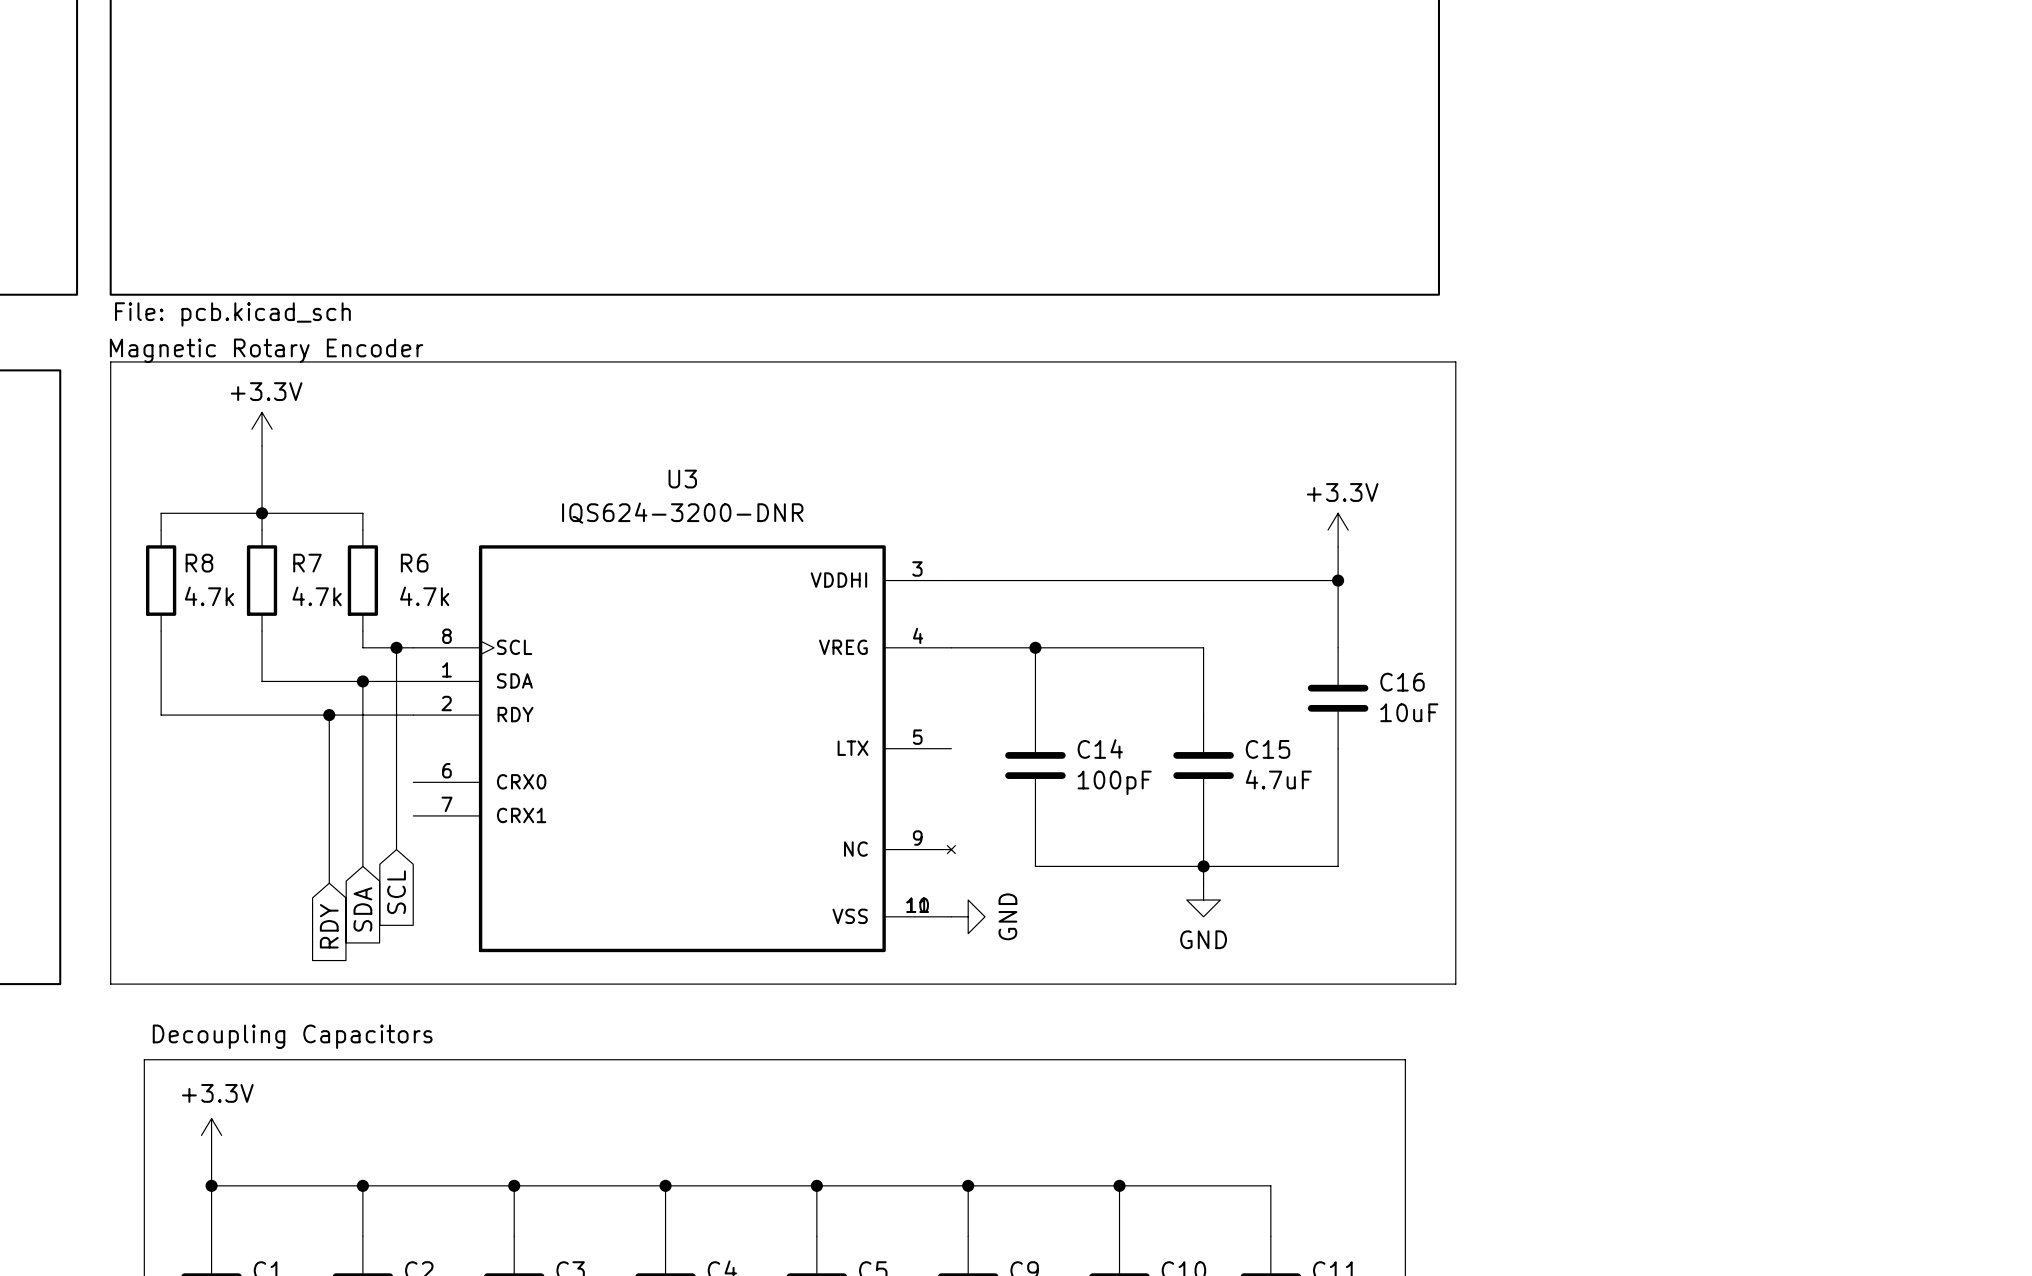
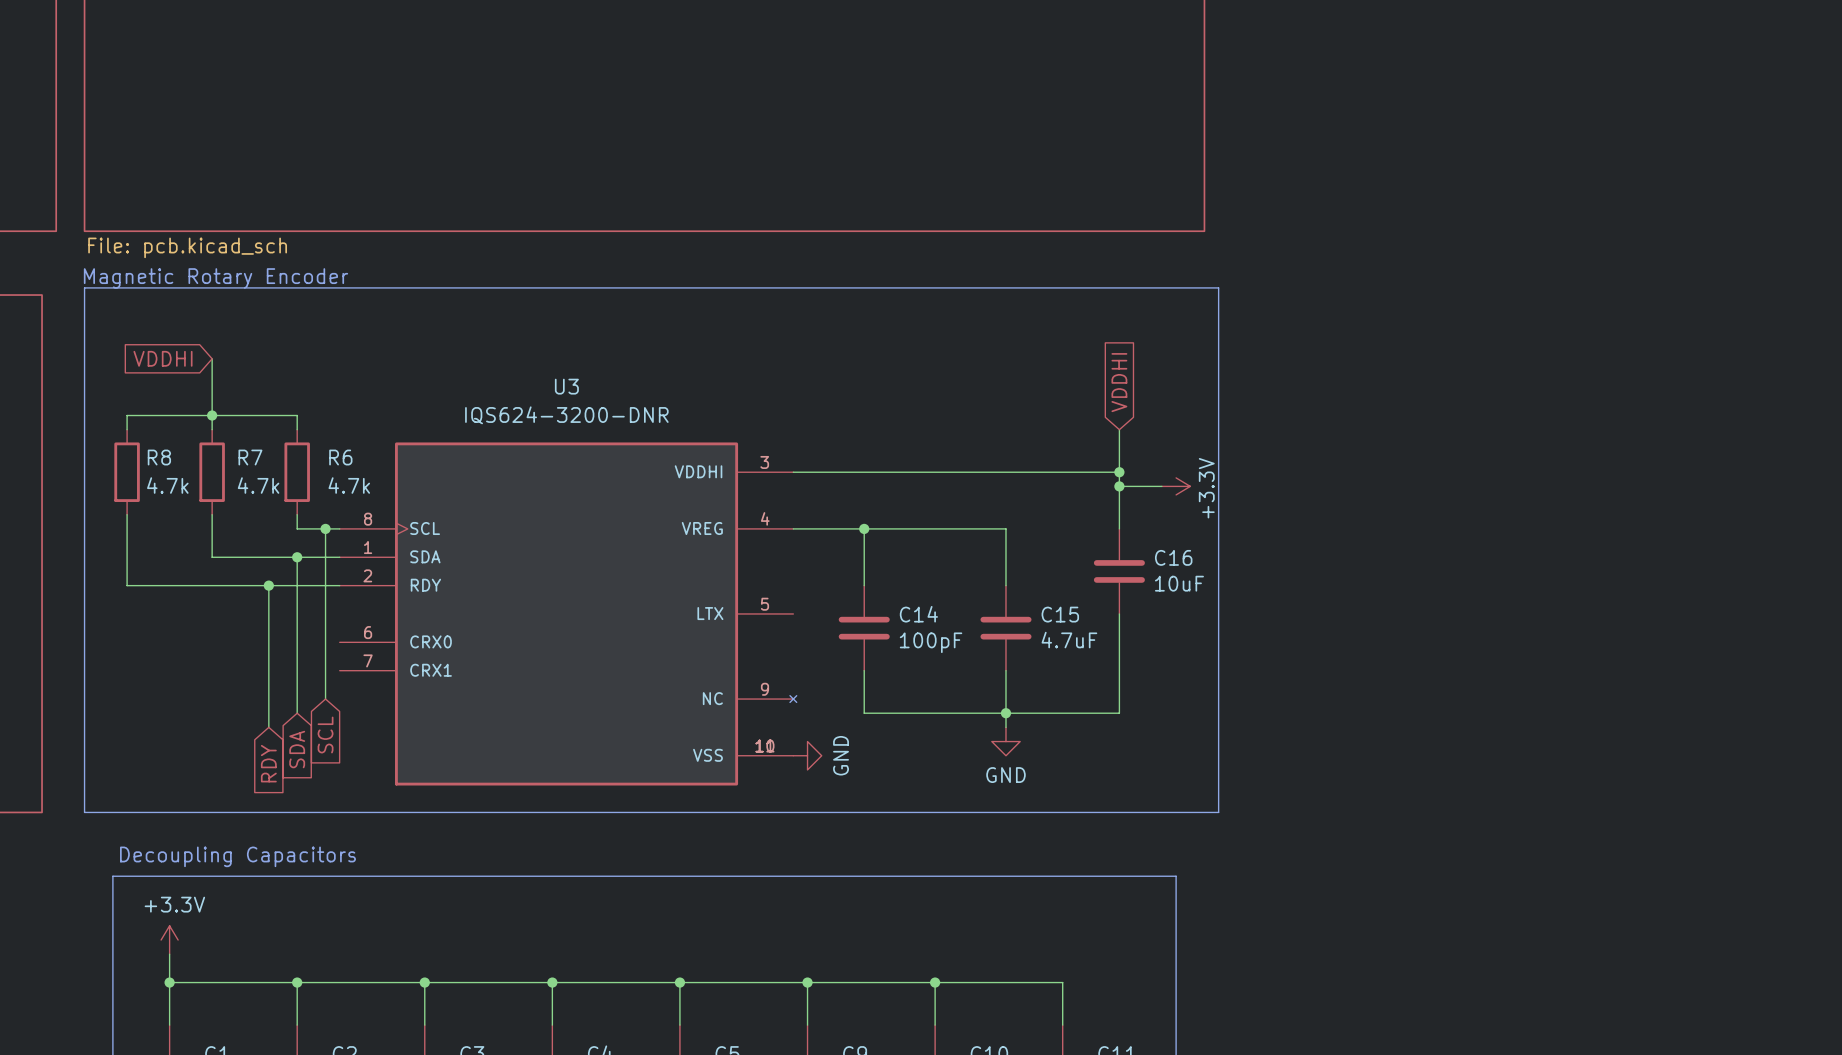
power symbol: +3.3V (262, 429) -> none
global label: none -> VDDHI (163, 358)
global label: none -> VDDHI (1119, 382)
power symbol rotation: 0° (1338, 530) -> 90° clockwise (1176, 486)
power symbol position: +3.3V (1338, 530) -> +3.3V (1176, 486)
wire: none -> (1119, 486) (1161, 486)
junction: none -> (1119, 486)

